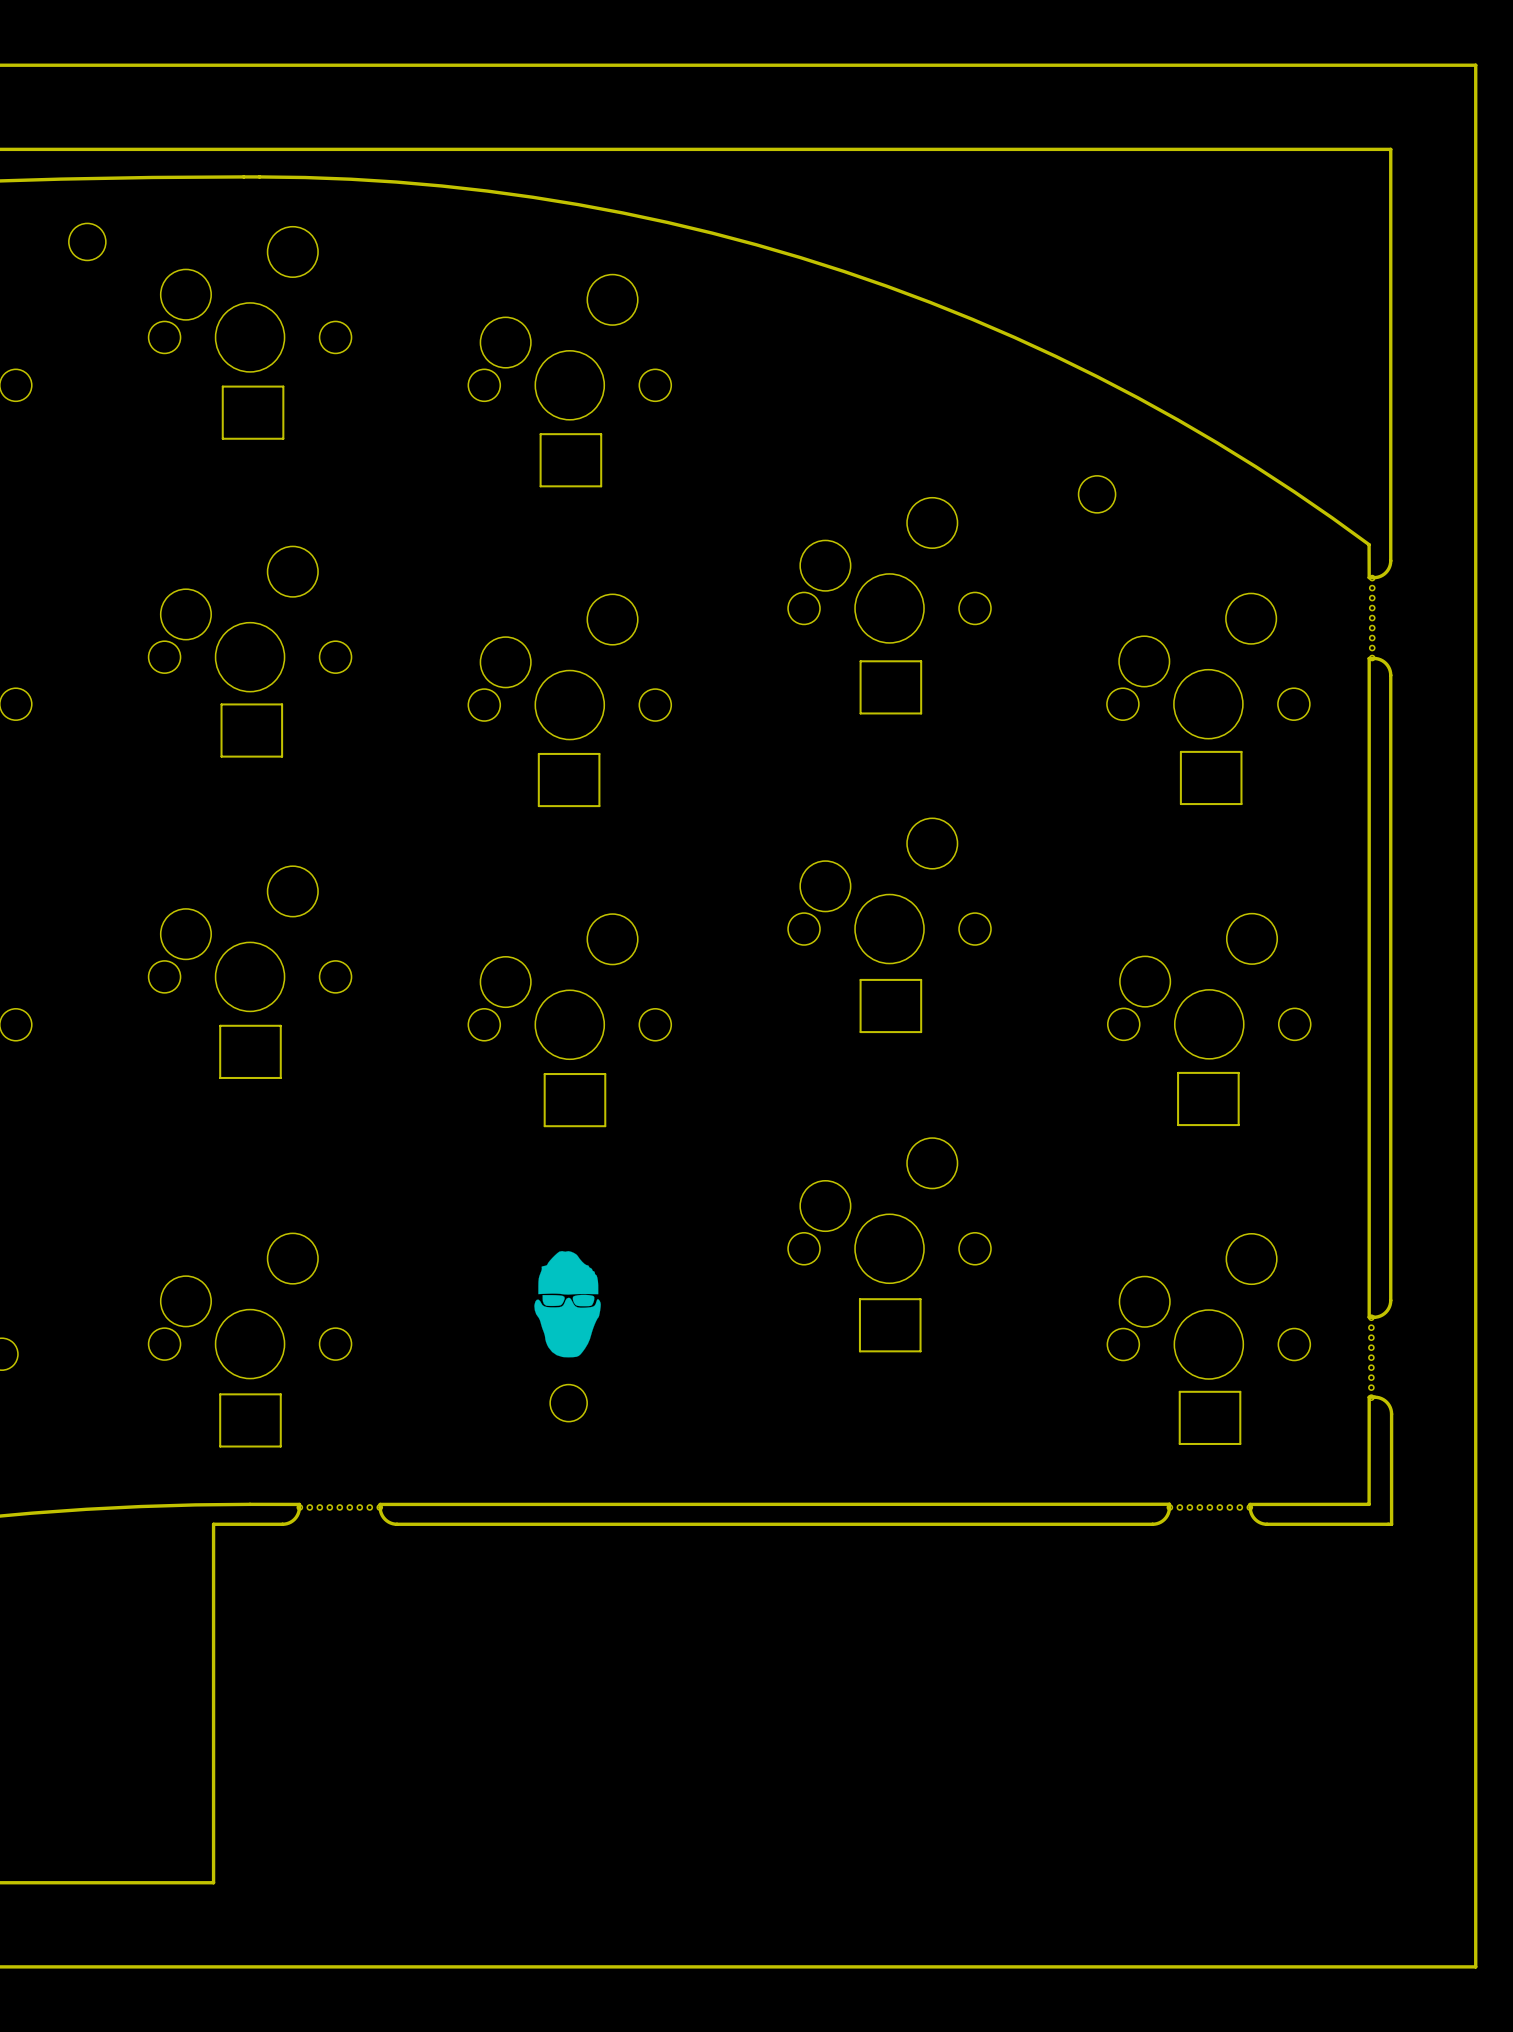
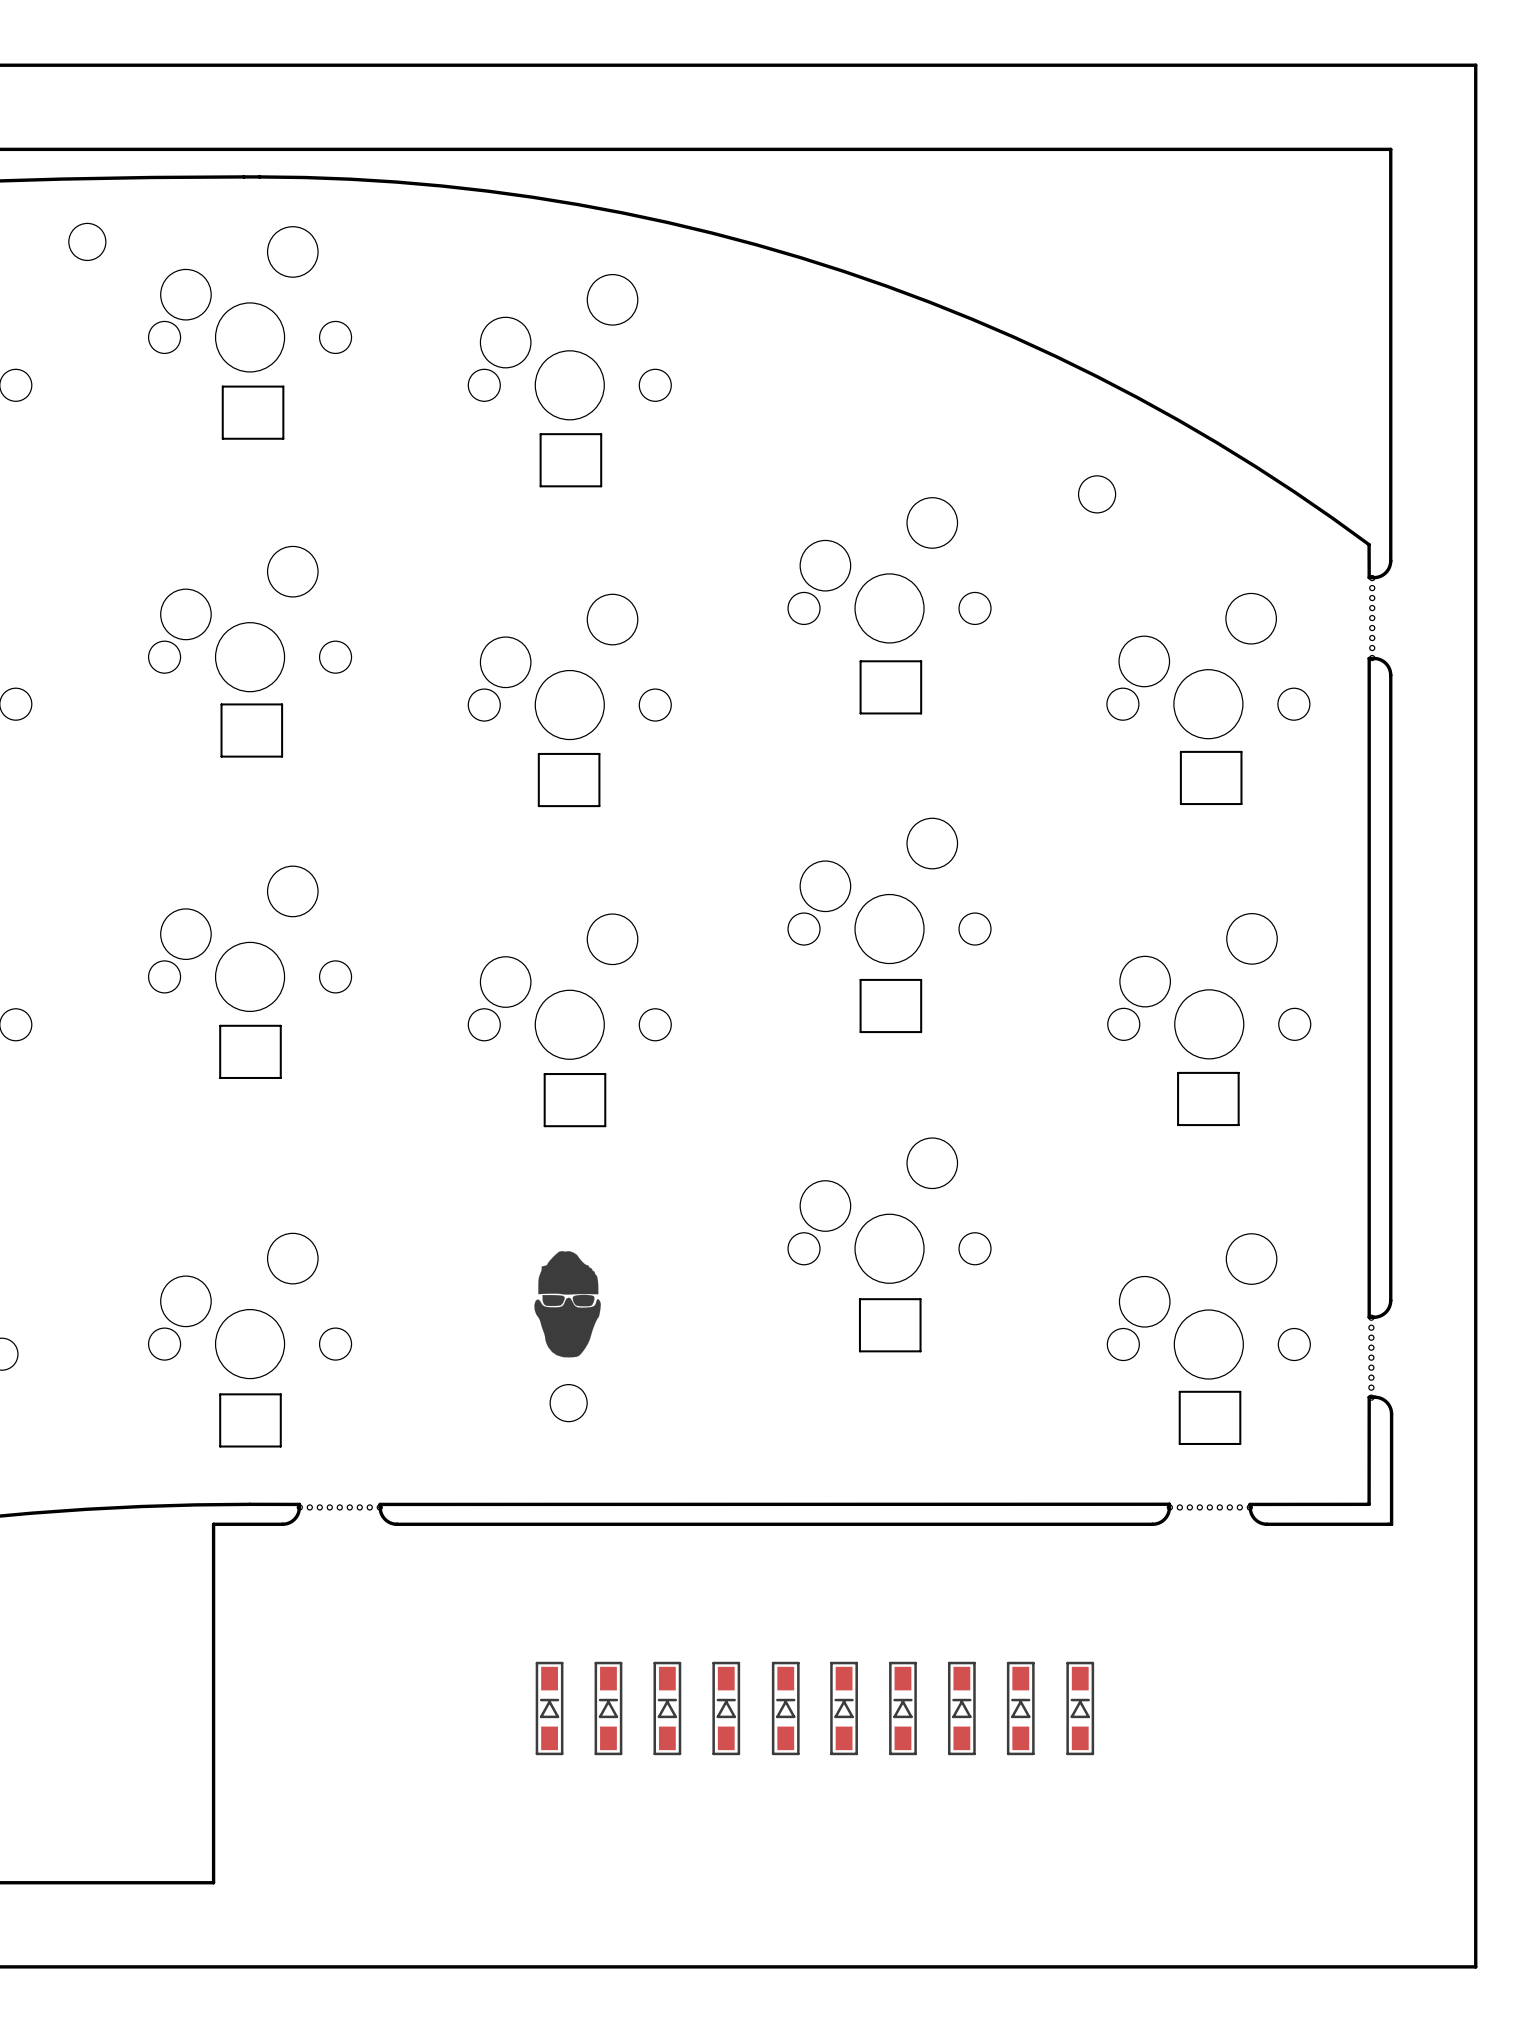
part: none -> (549, 1708)
part: none -> (608, 1708)
part: none -> (667, 1708)
part: none -> (726, 1708)
part: none -> (785, 1708)
part: none -> (844, 1708)
part: none -> (902, 1708)
part: none -> (961, 1708)
part: none -> (1020, 1708)
part: none -> (1080, 1708)

